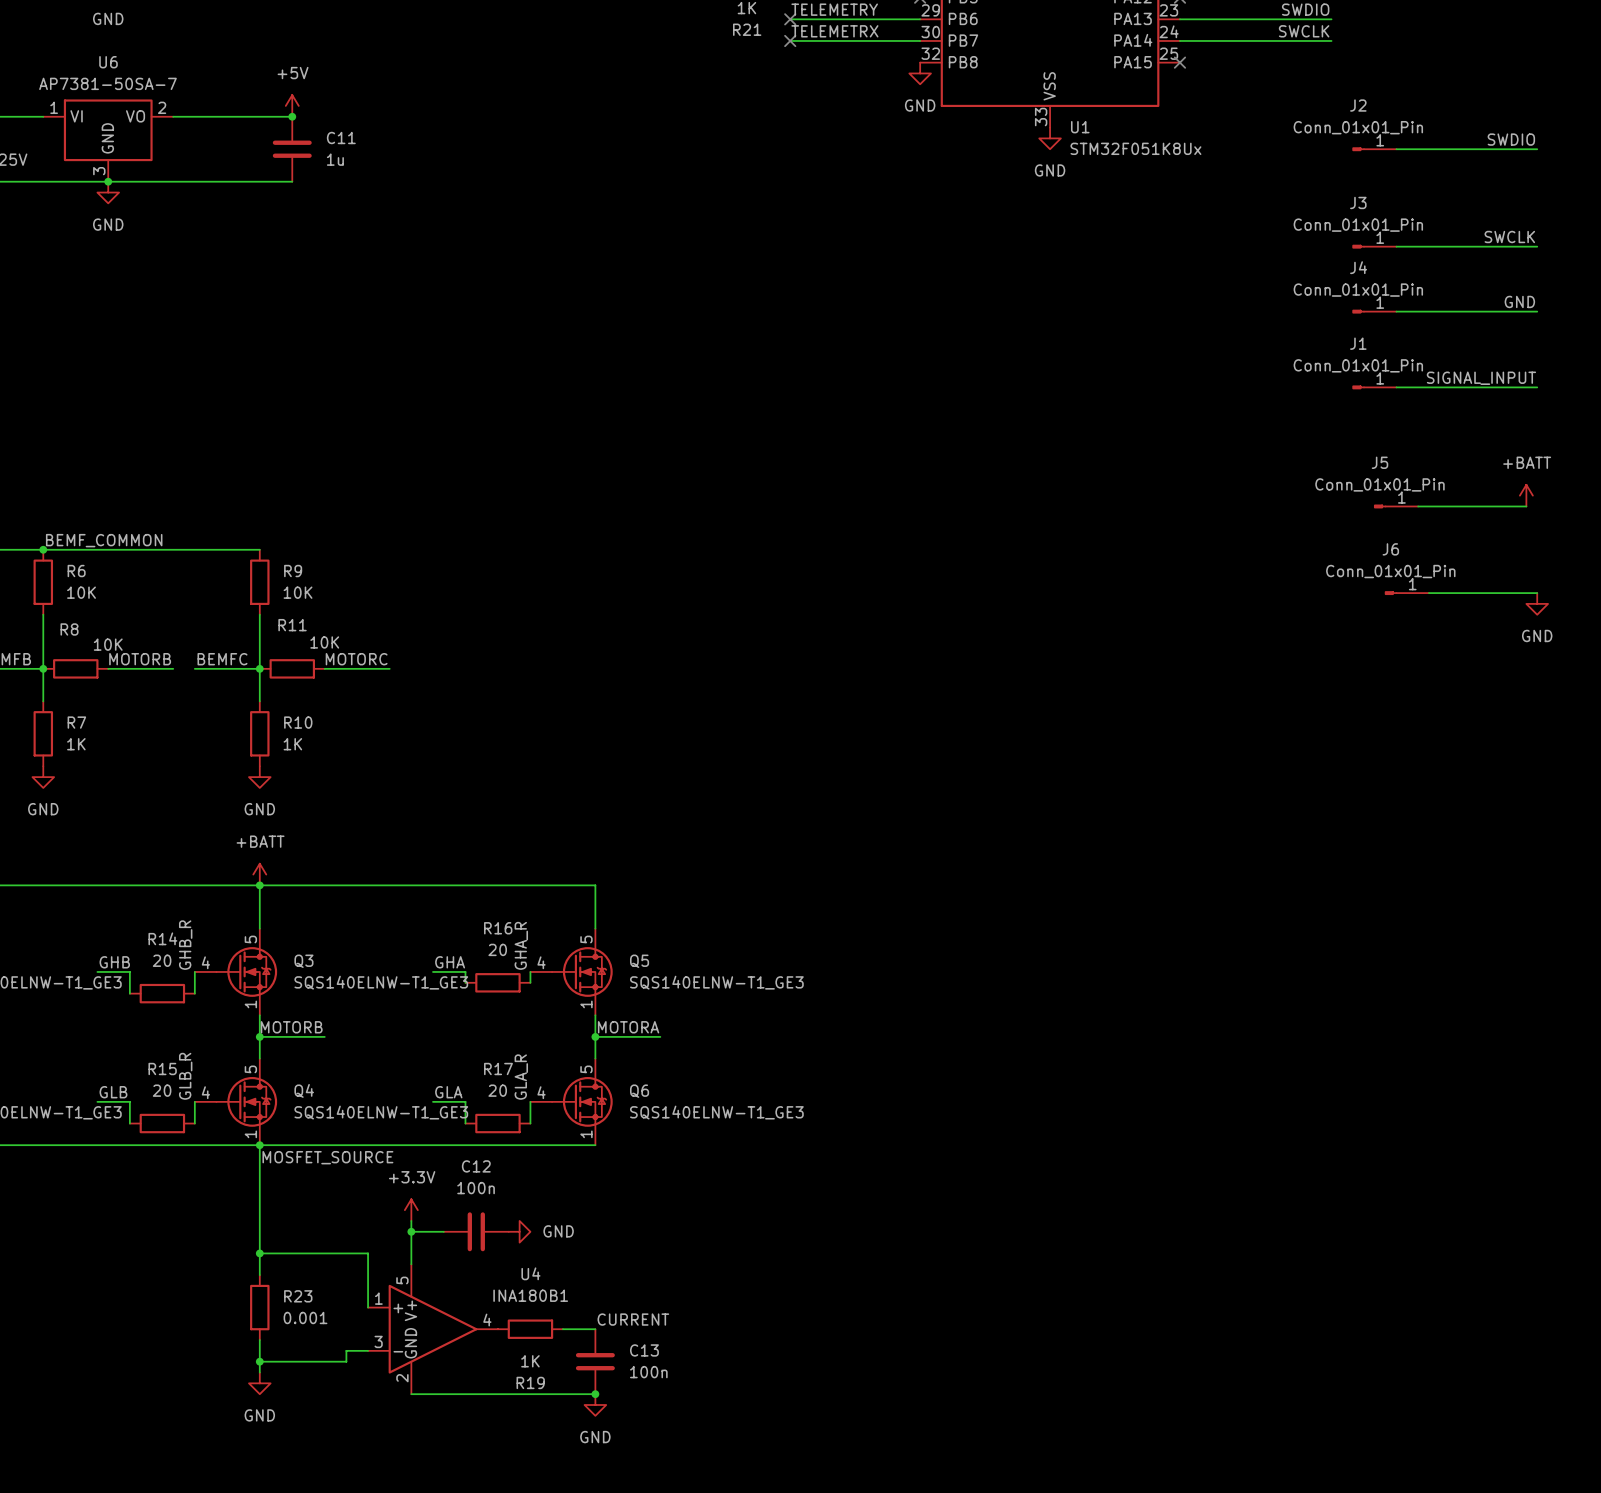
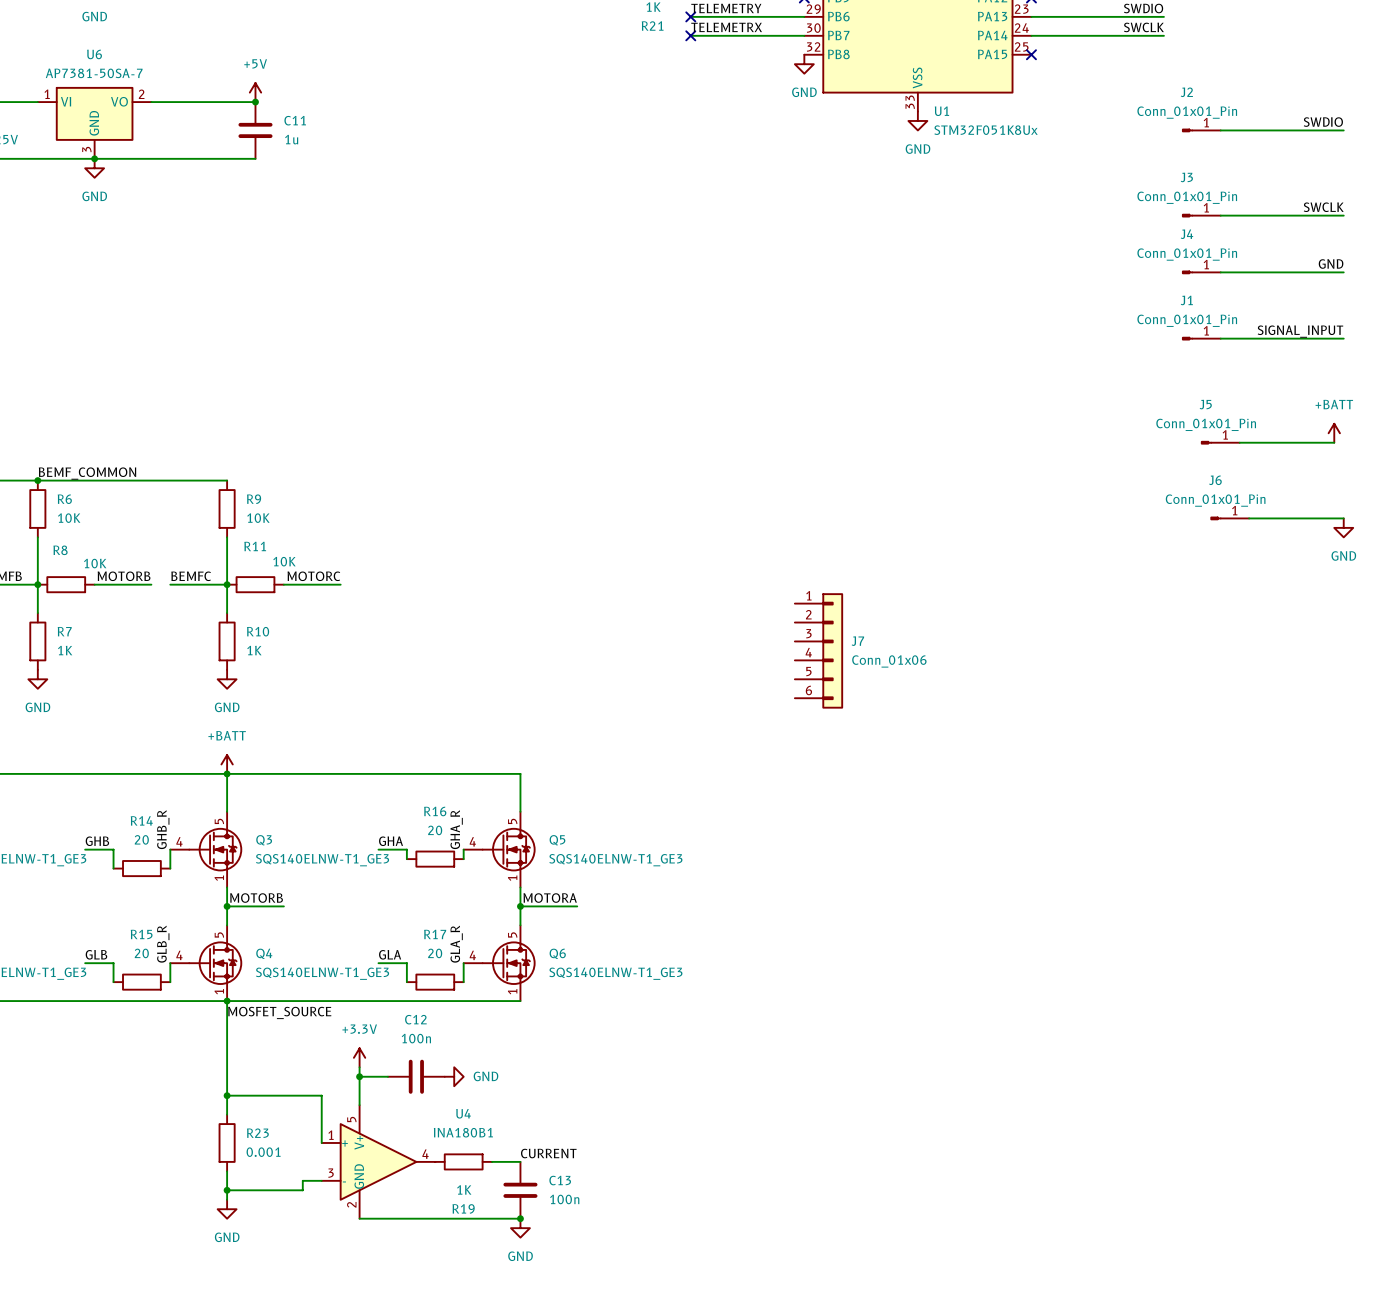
J7: none -> Conn_01x06 (819, 650)

